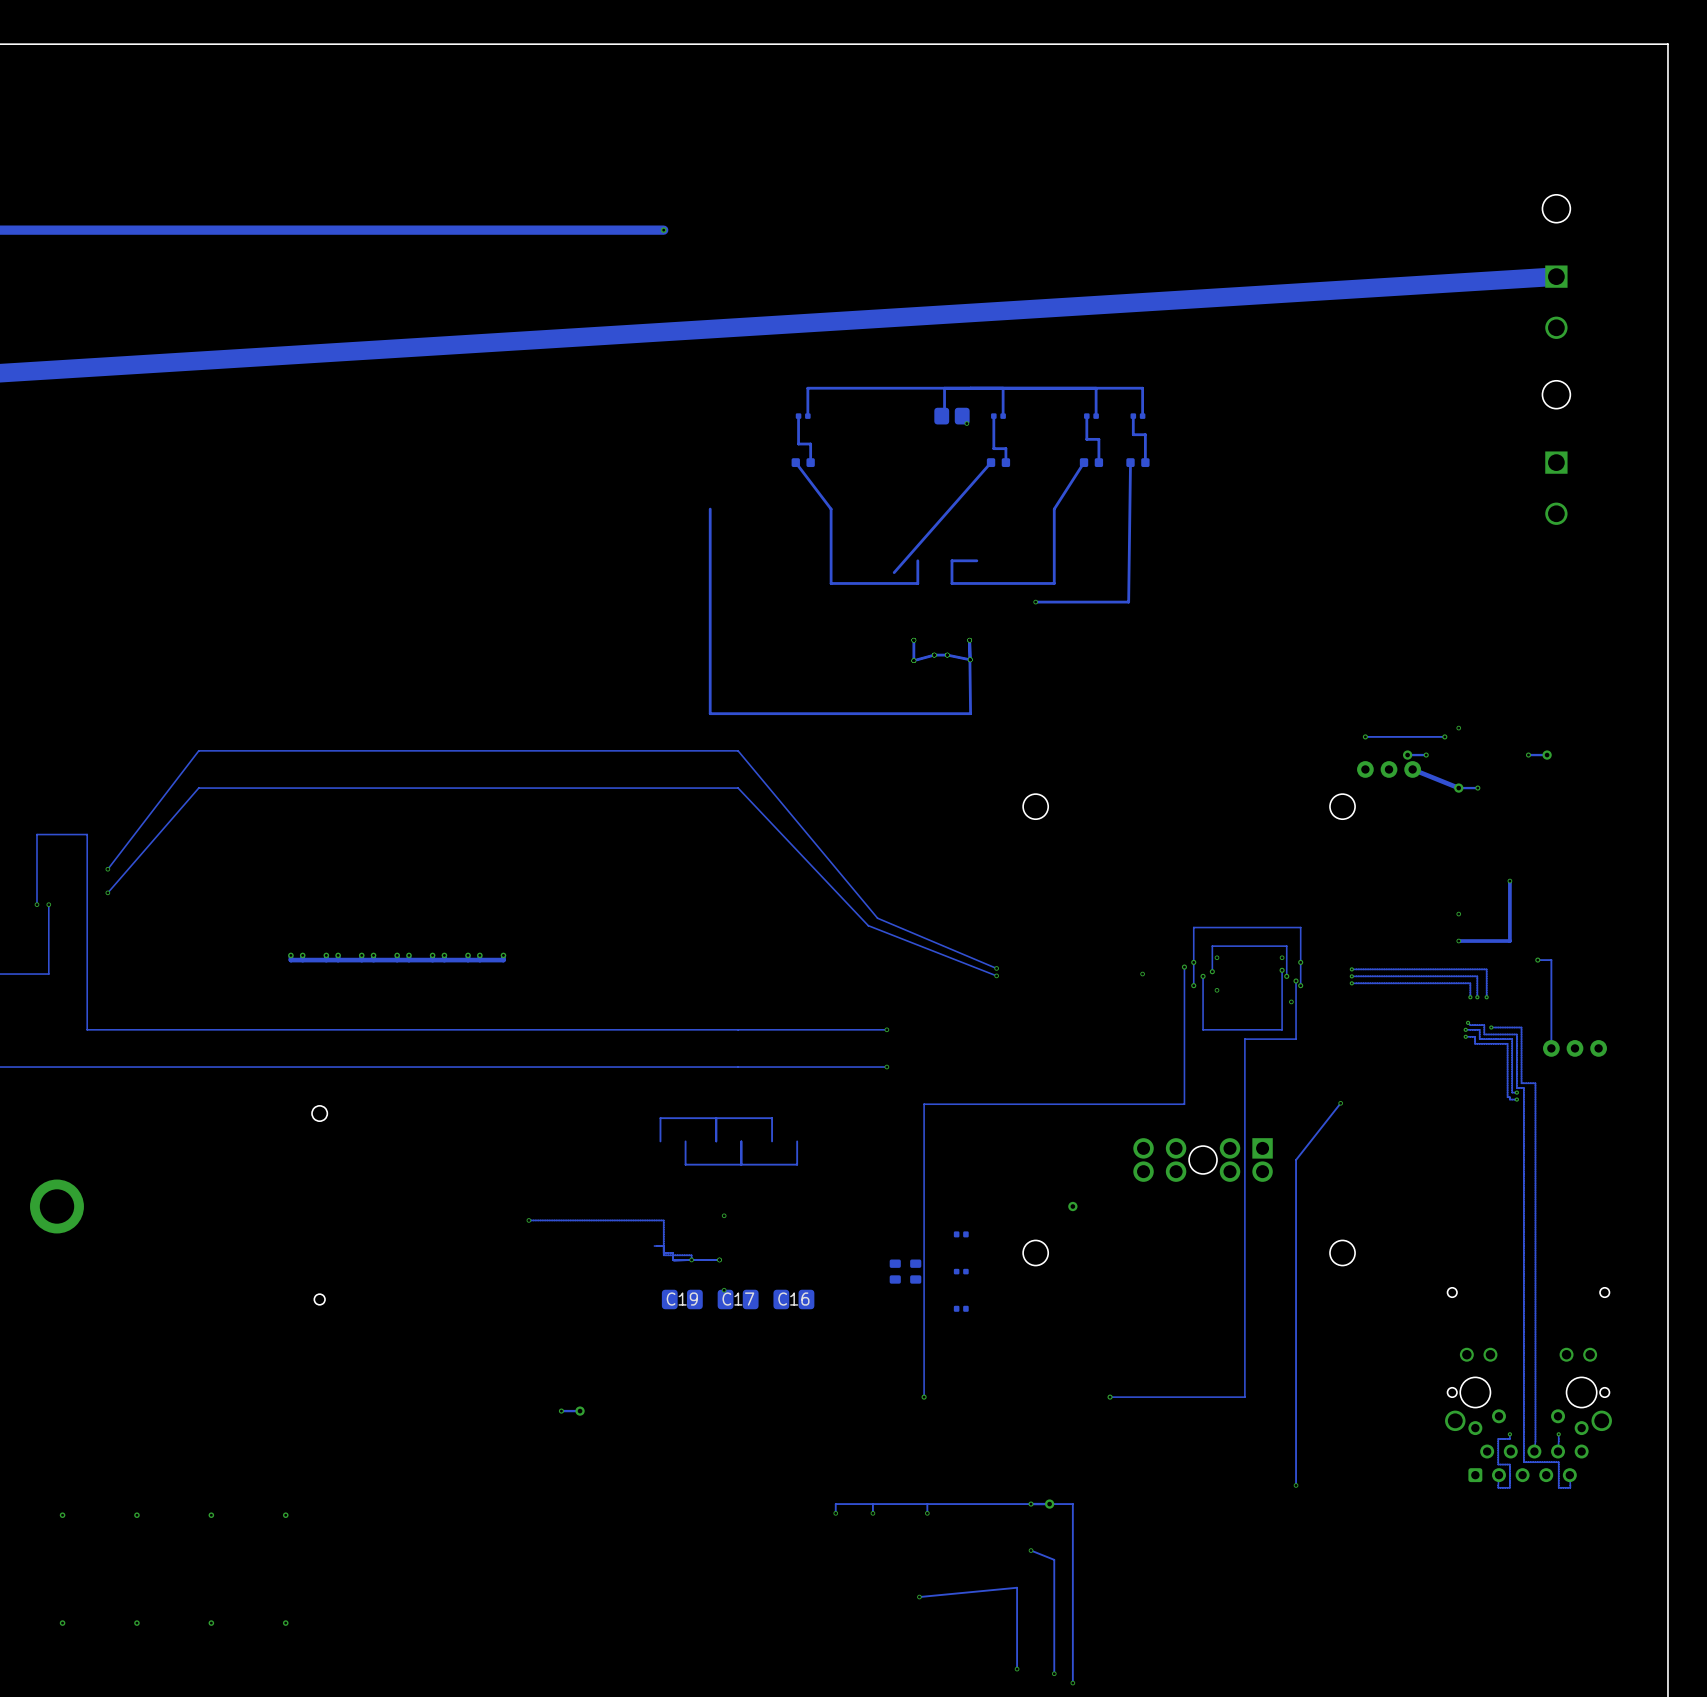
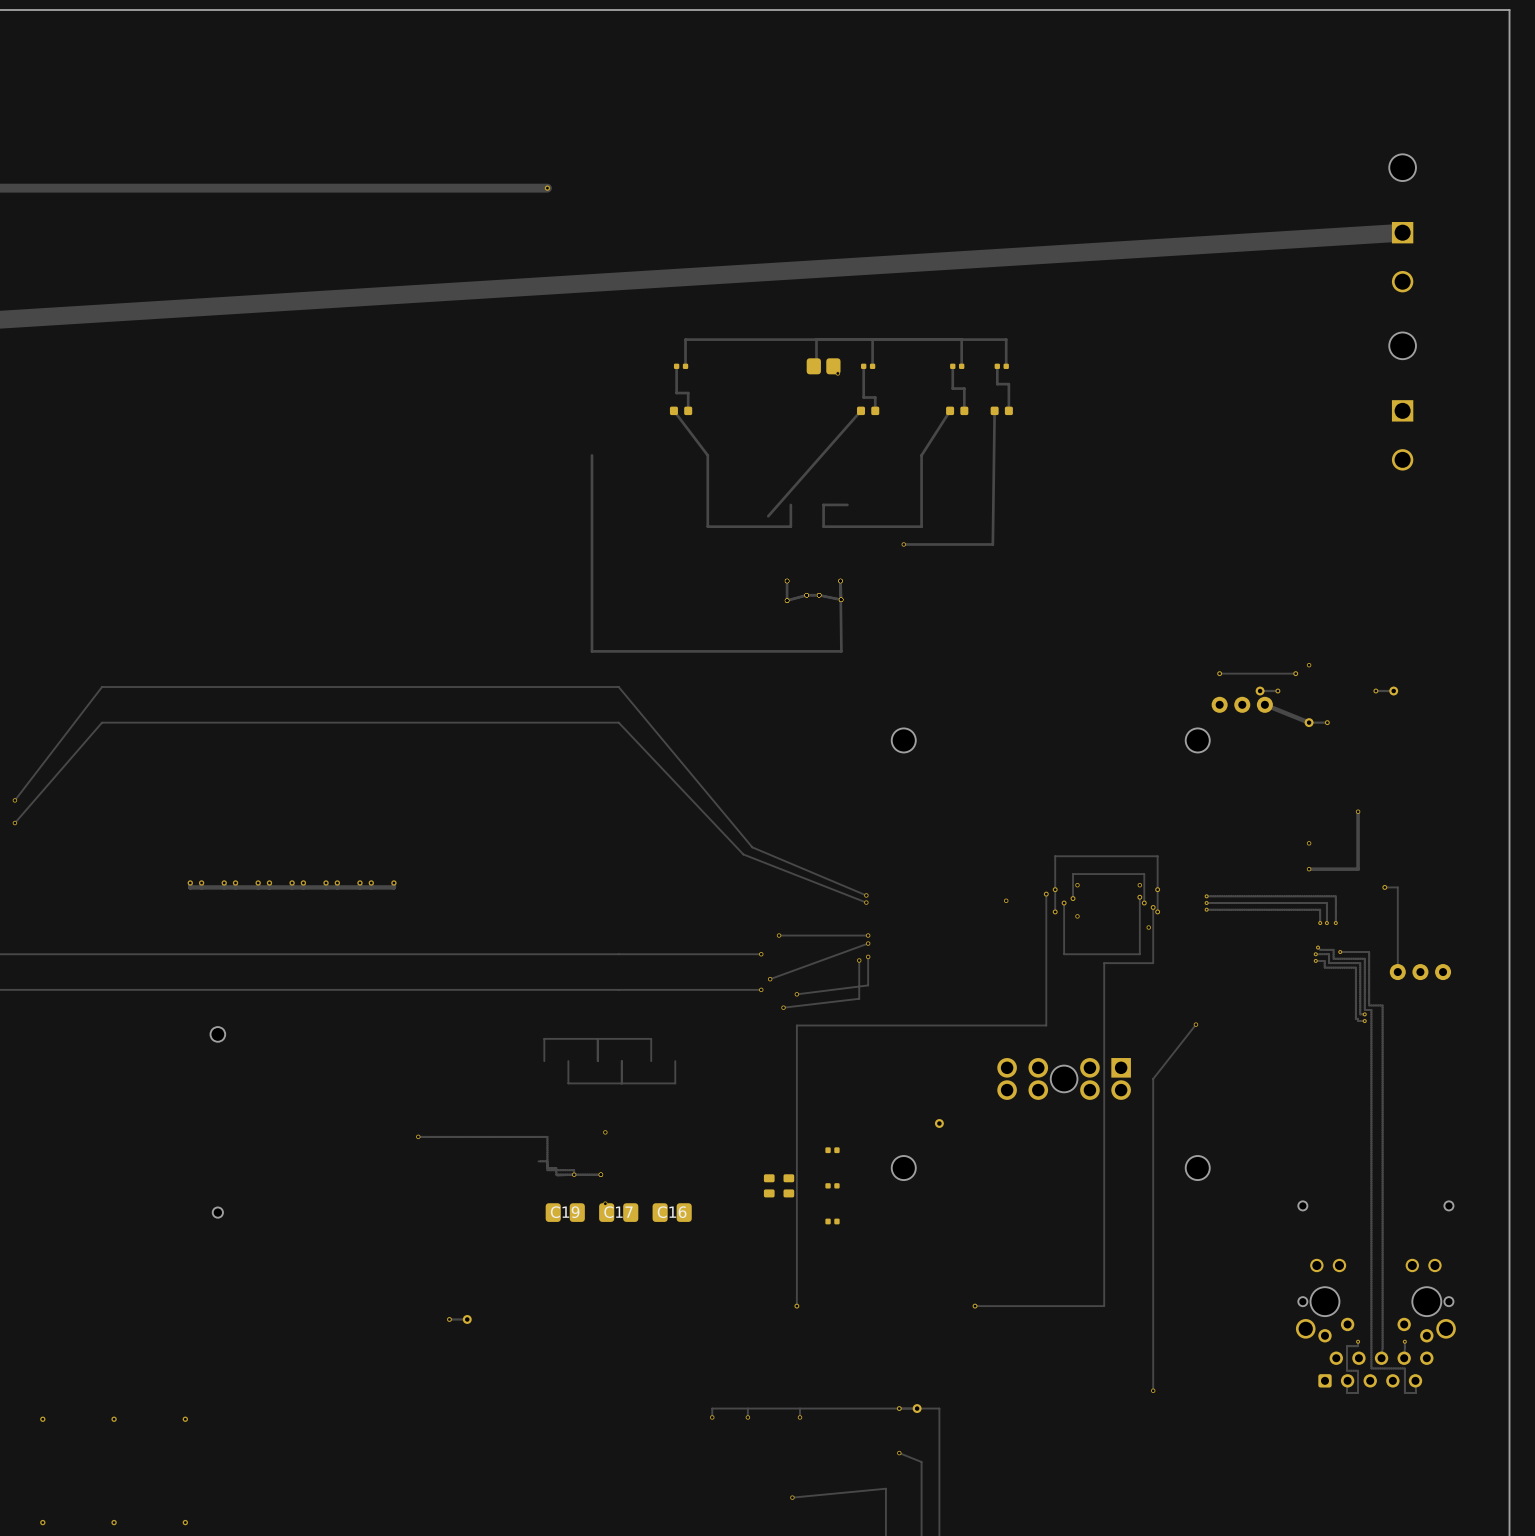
via: none -> (779, 935)
track: none -> (868, 935) (779, 935)
via: none -> (868, 935)
track: none -> (868, 943) (770, 979)
via: none -> (868, 943)
track: none -> (868, 956) (868, 985) (796, 994)
via: none -> (868, 956)
track: none -> (859, 960) (859, 998) (783, 1007)
via: none -> (859, 960)
via: none -> (770, 979)
via: none -> (796, 994)
via: none -> (783, 1007)

